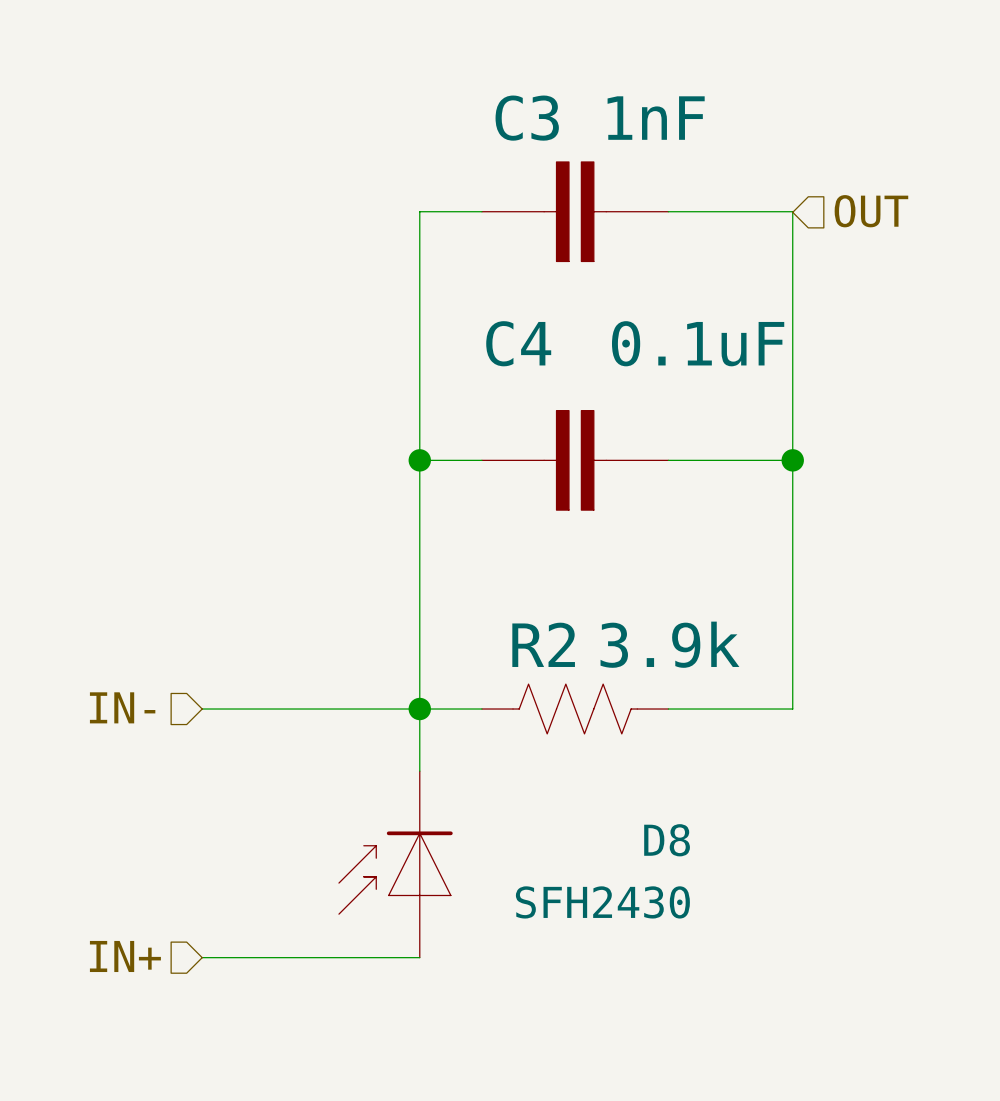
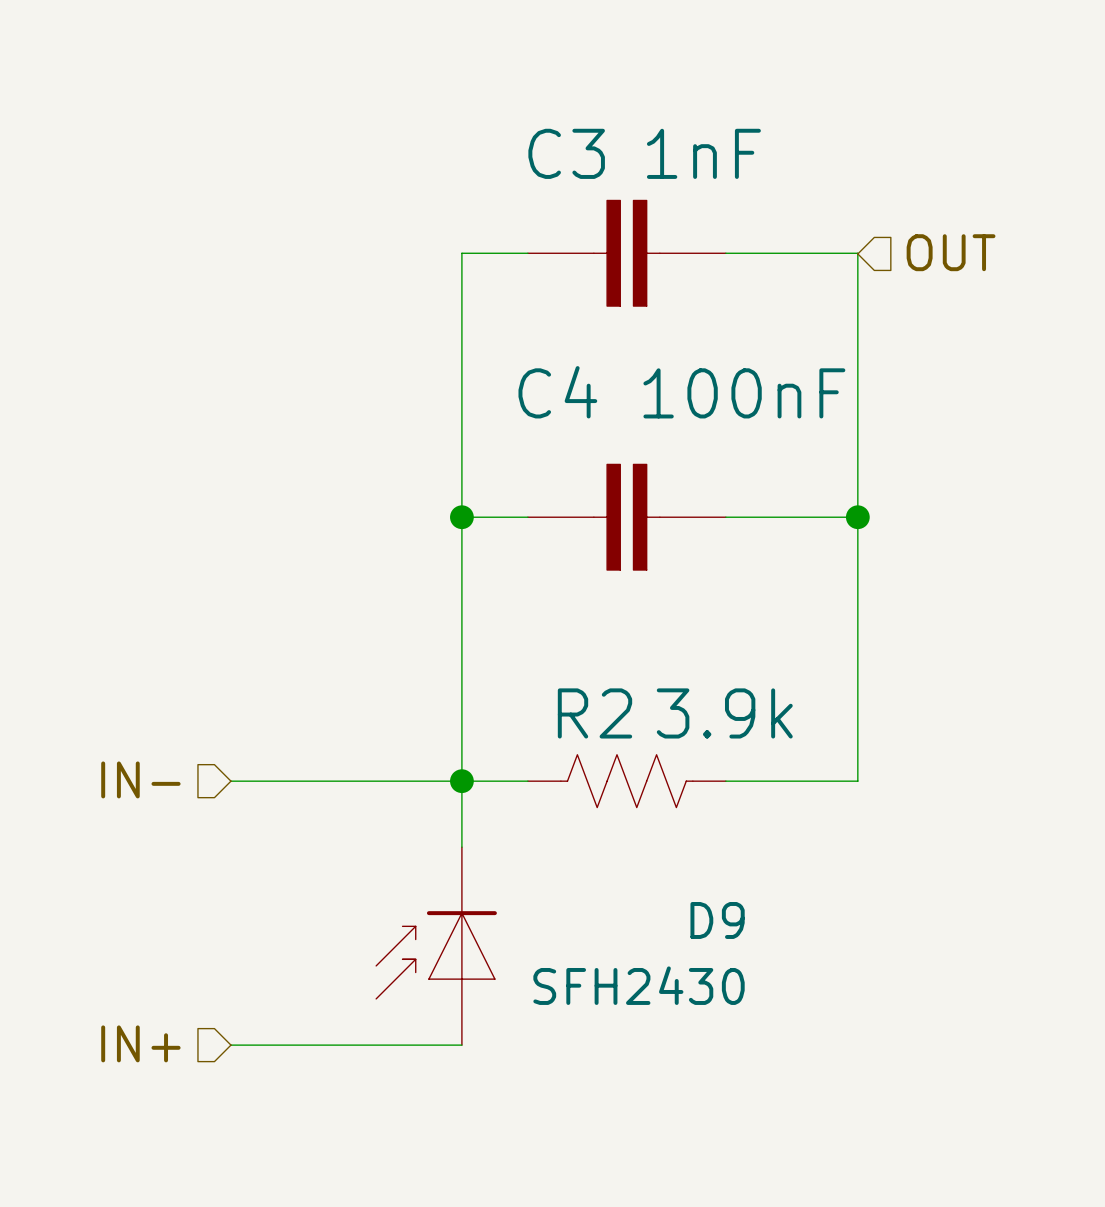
C4 value: 0.1uF (698, 343) -> 100nF (744, 393)
D8 name: D8 (667, 840) -> D9 (717, 920)

